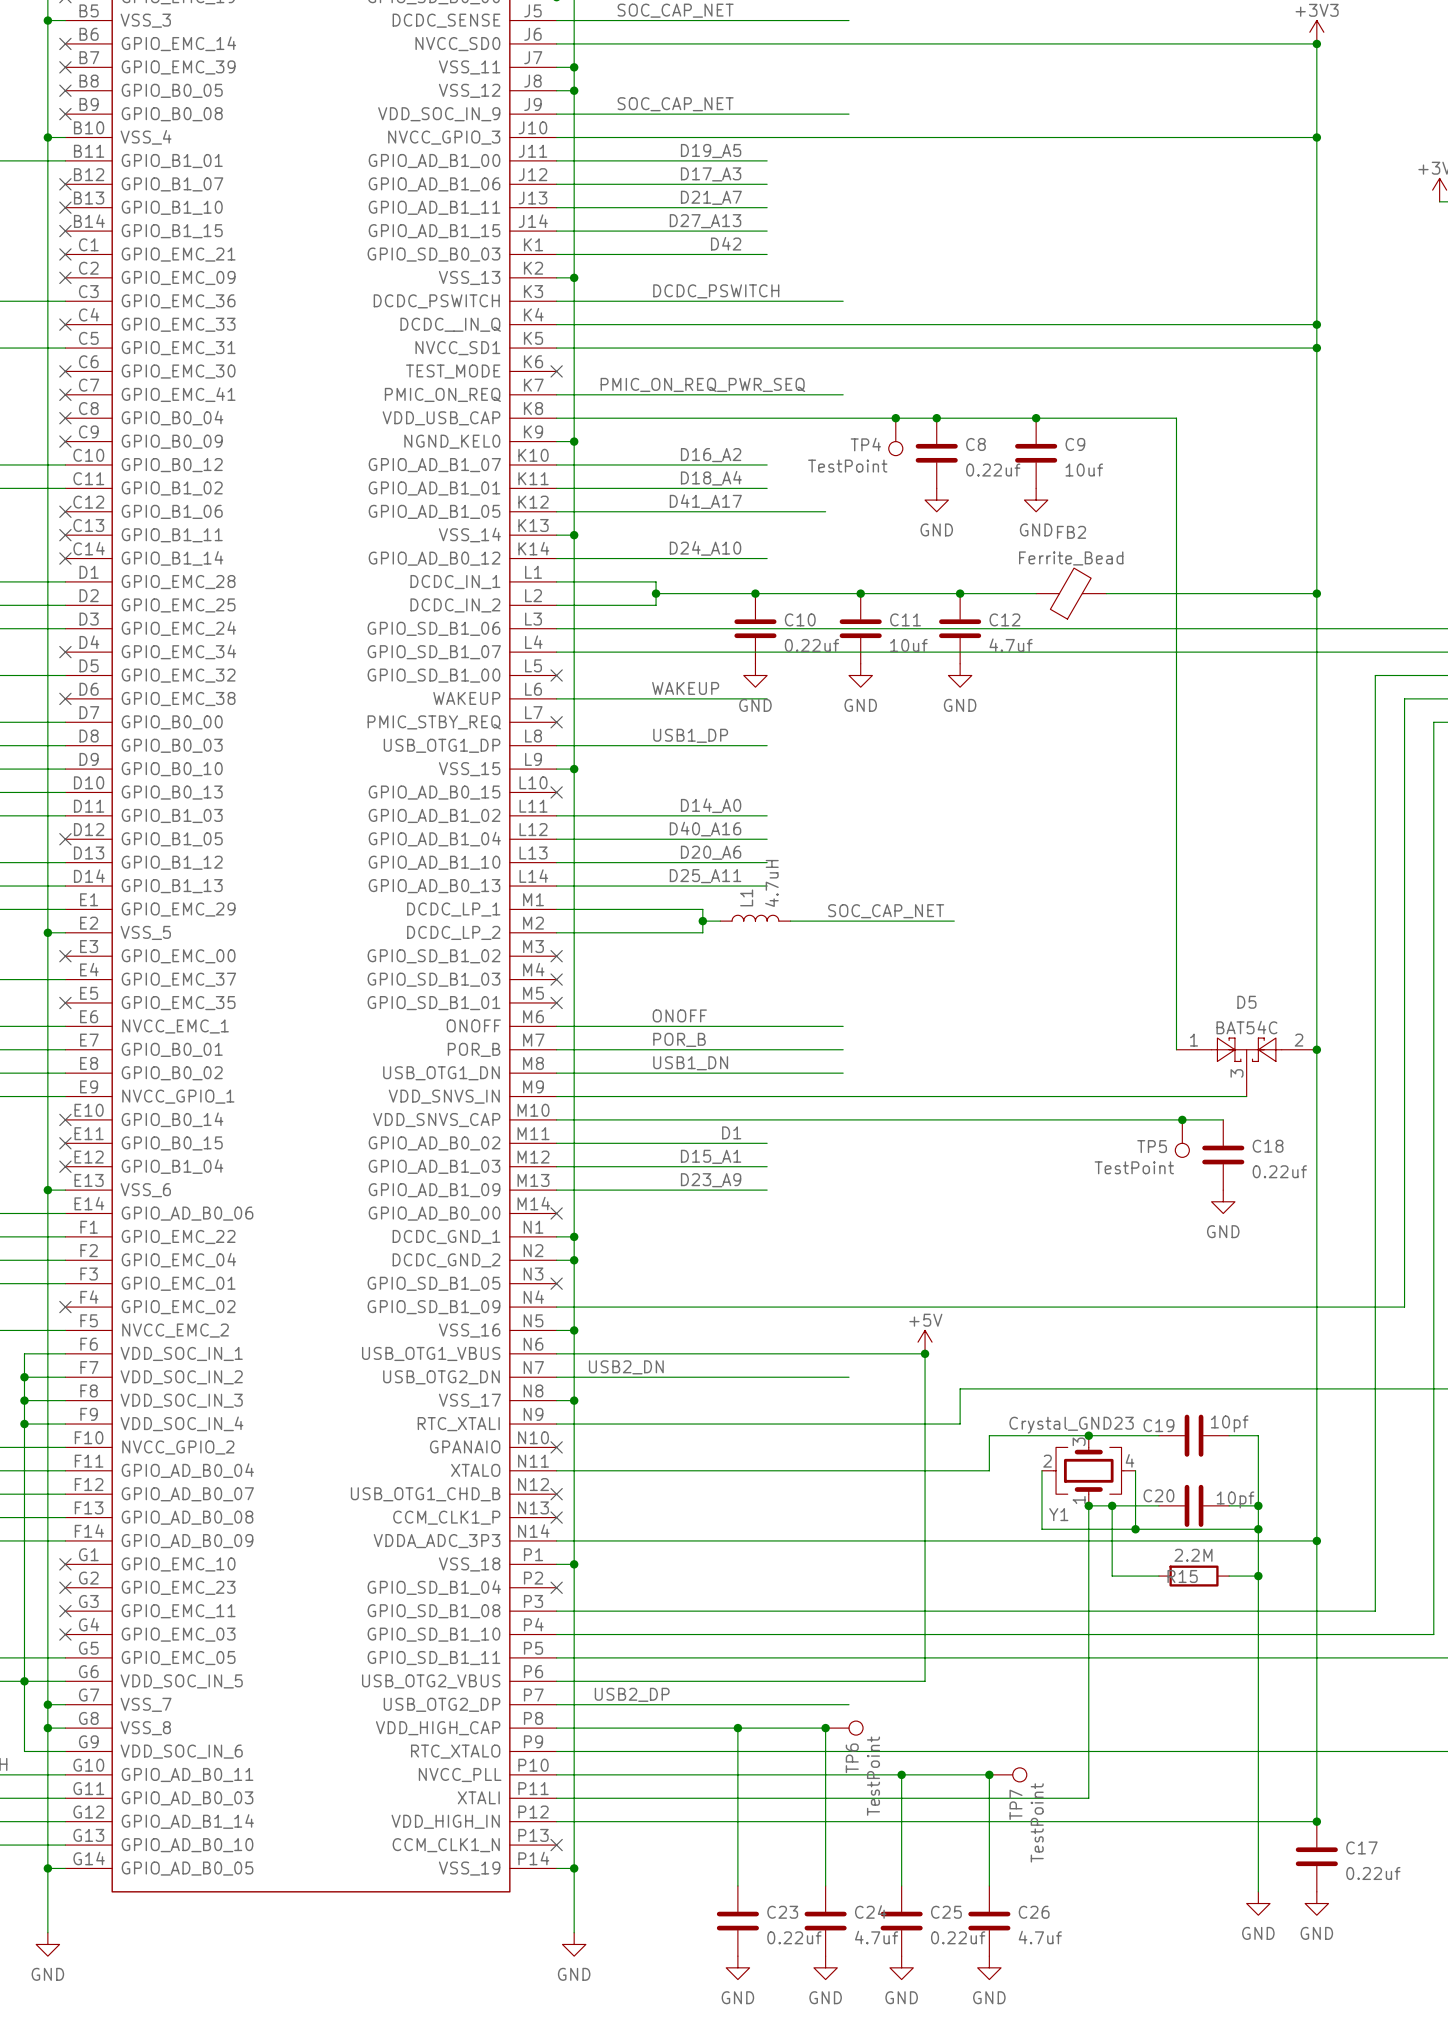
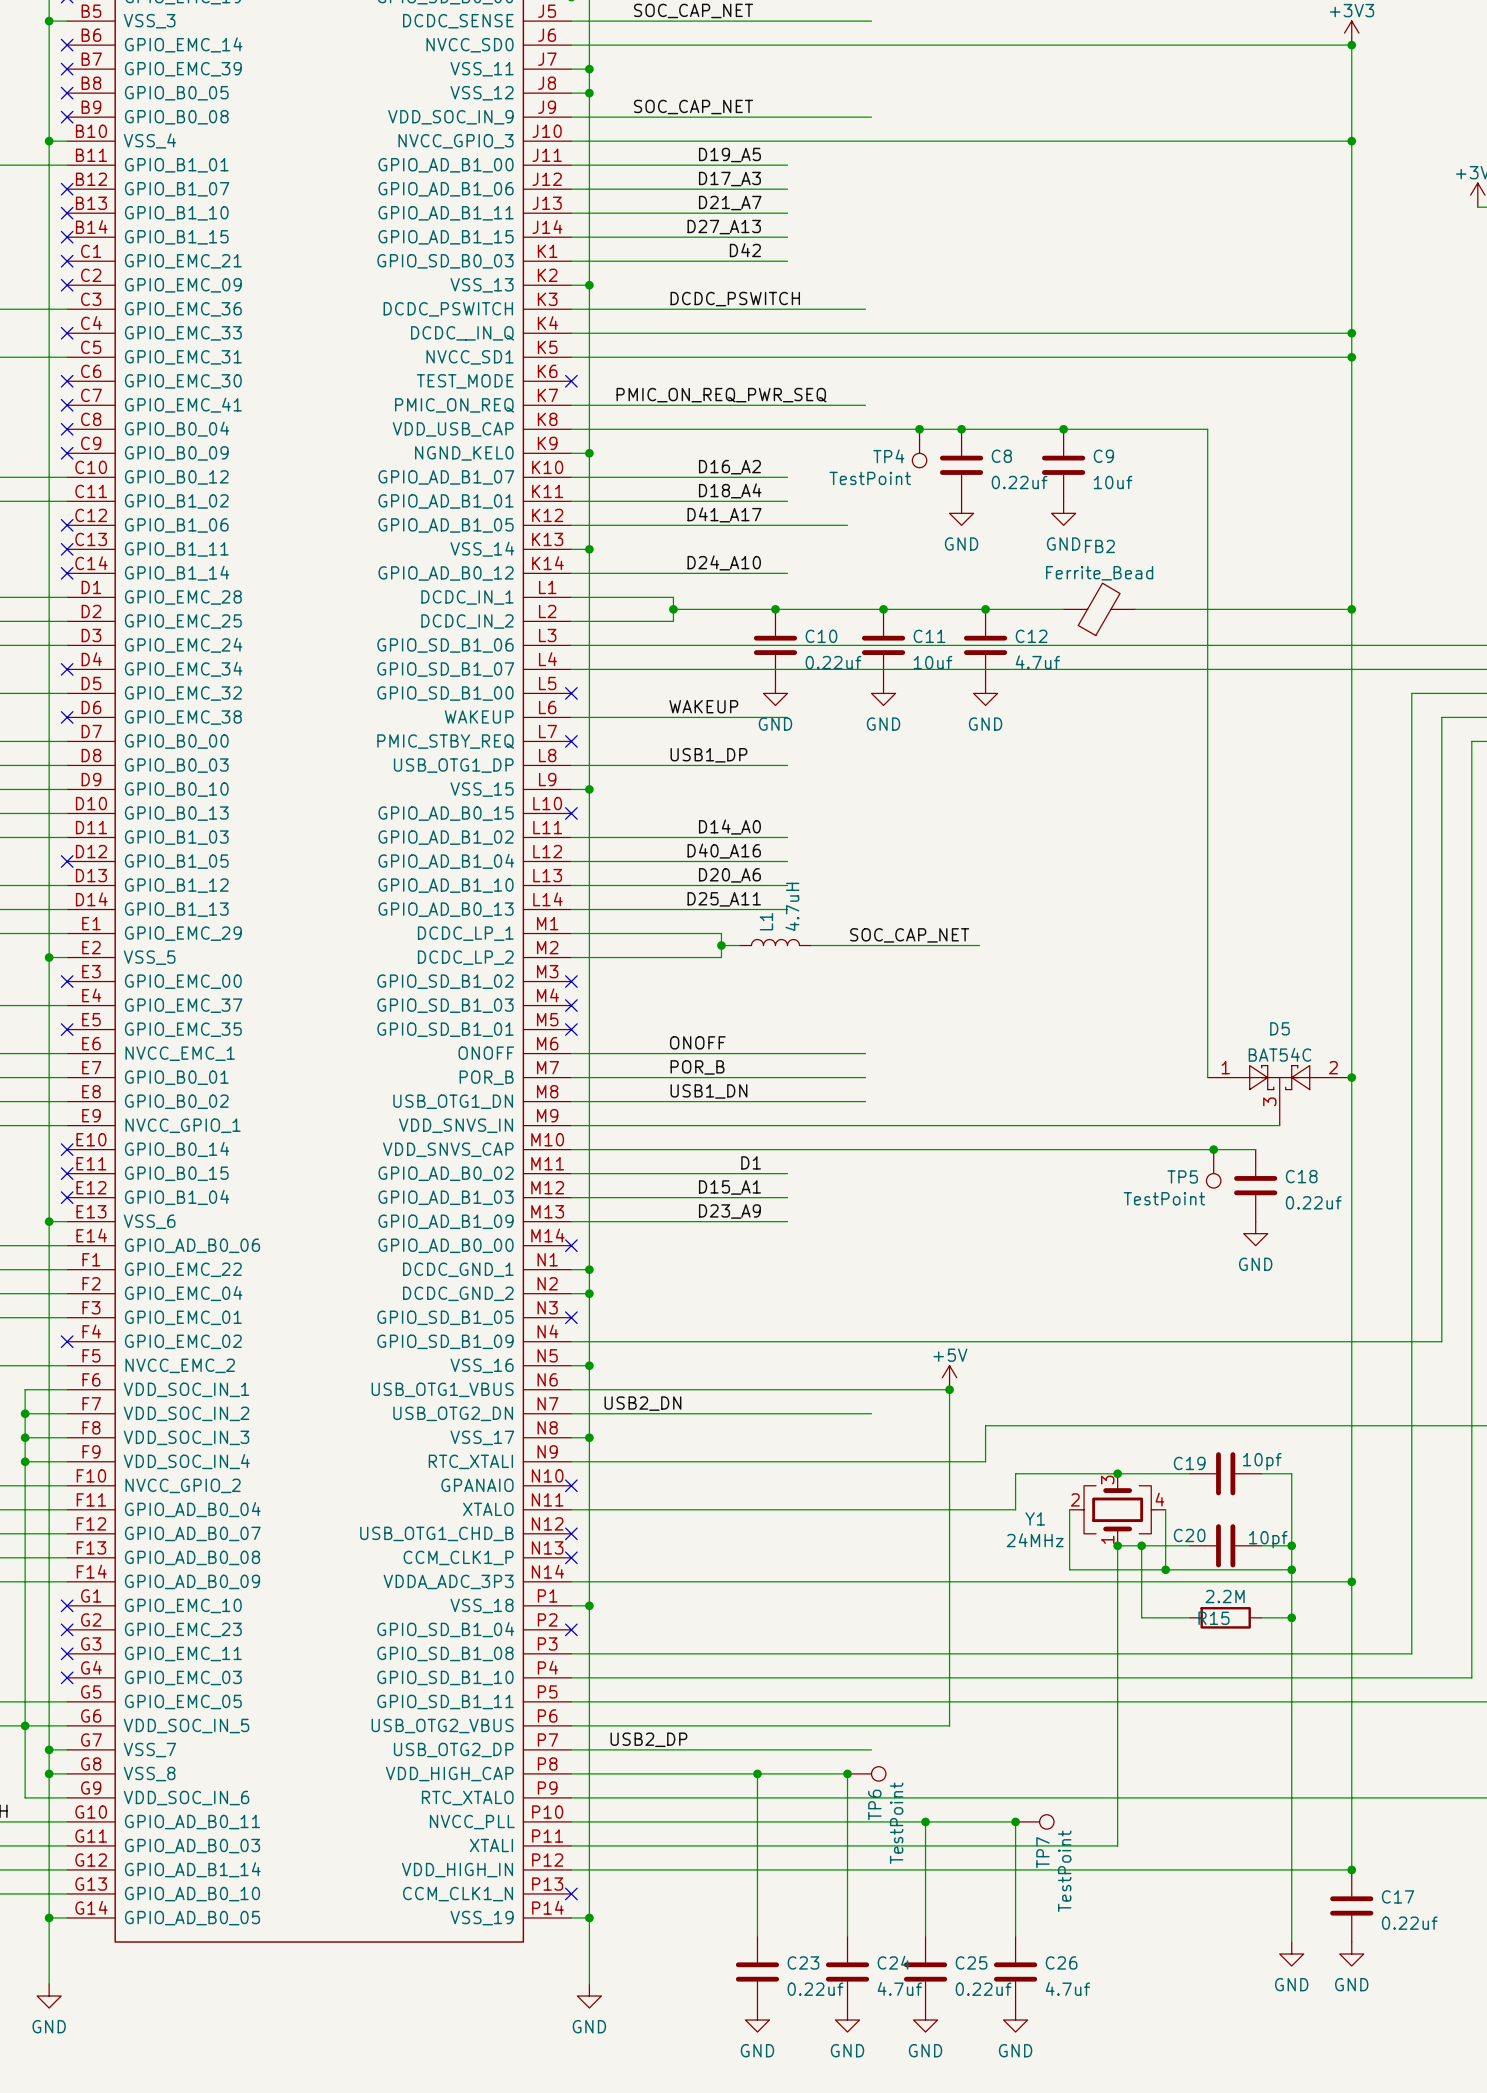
Y1 value: Crystal_GND23 (1071, 1425) -> 24MHz (1035, 1540)
Y1 name position: Y1 (1058, 1514) -> Y1 (1035, 1518)

